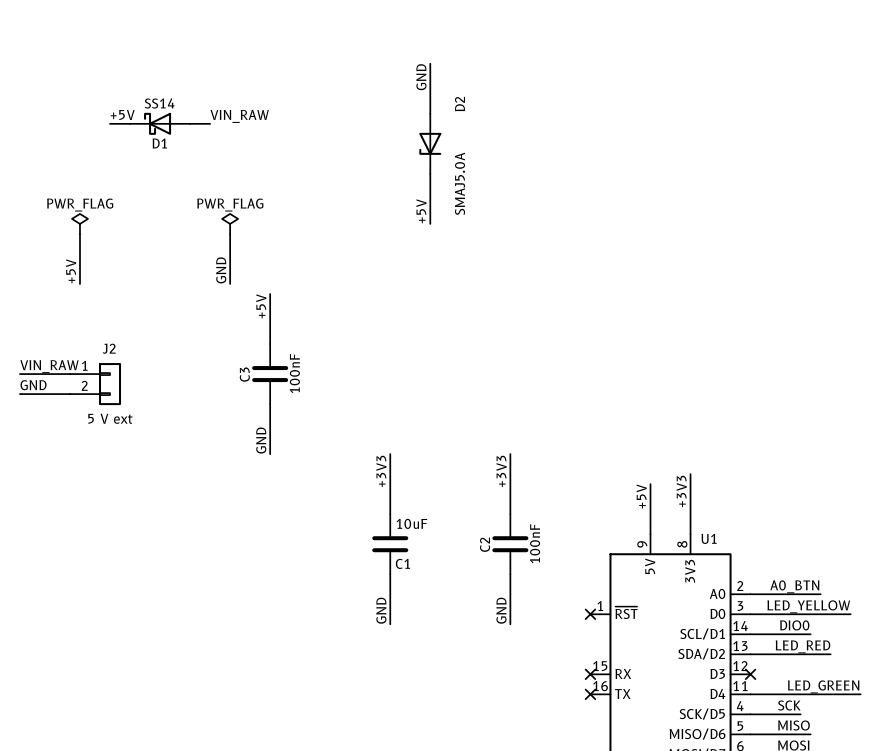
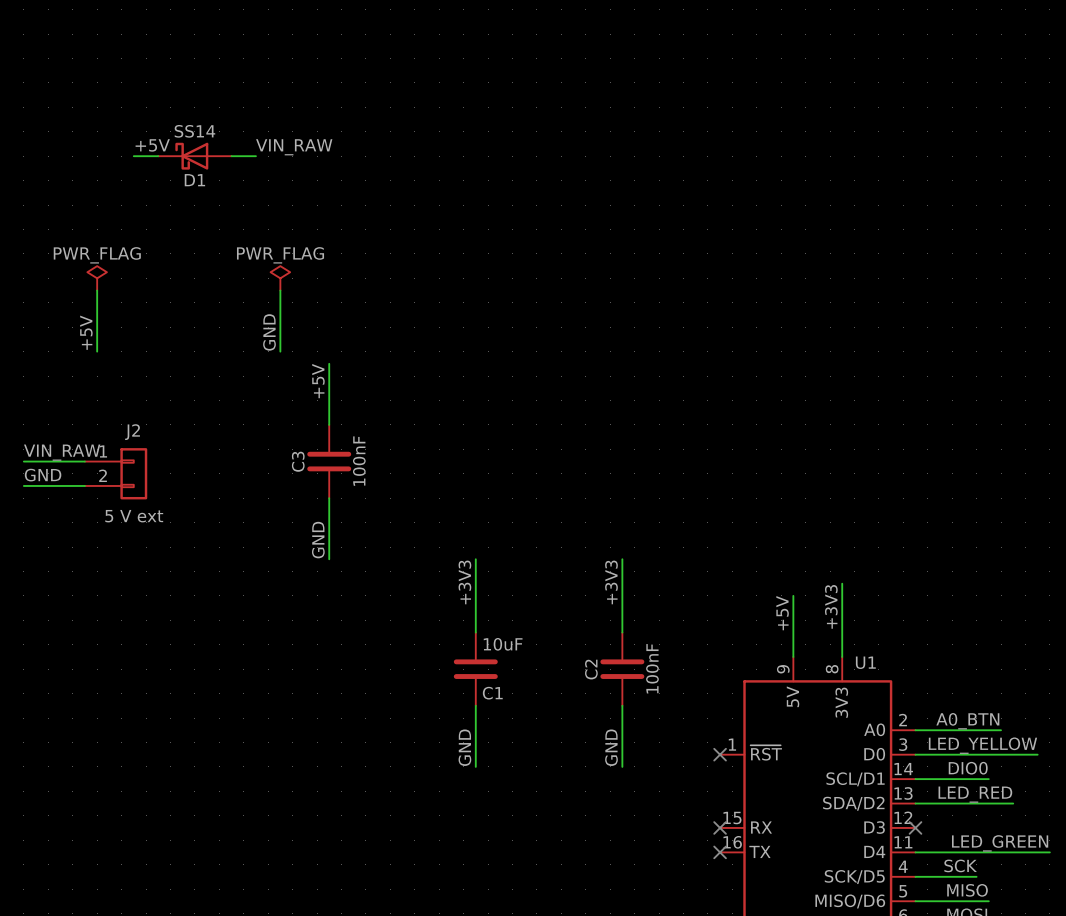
wire: (430, 63) (430, 113) -> none
label: GND (421, 77) -> none
D2: SMAJ5.0A (430, 143) -> none
wire: (430, 173) (430, 223) -> none
label: +5V (421, 211) -> none

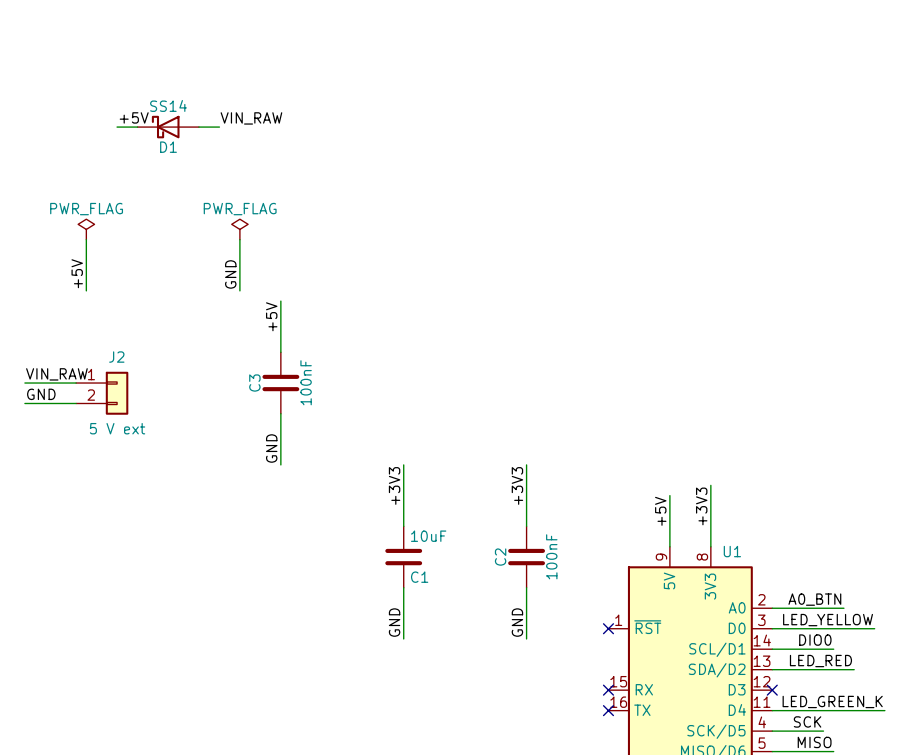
label: LED_GREEN (1000, 843) -> LED_GREEN_K (832, 701)

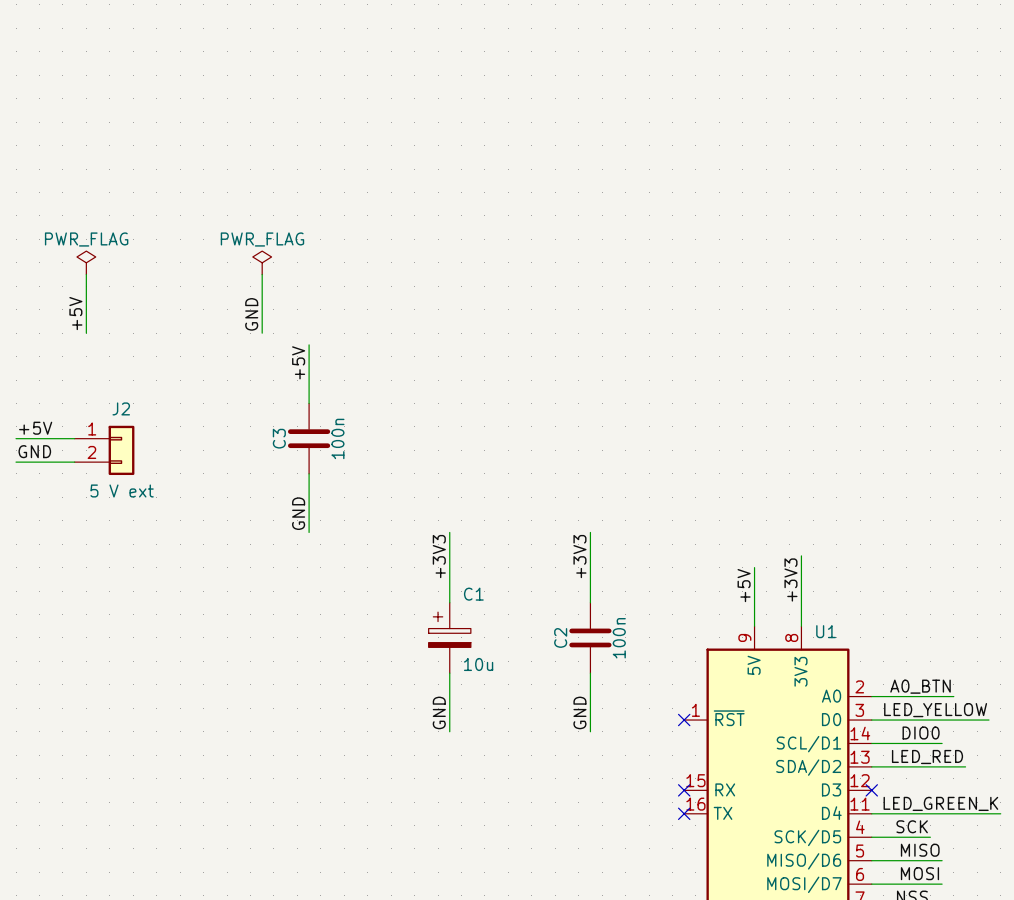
label: +5V (134, 117) -> none
label: VIN_RAW (251, 118) -> none
wire: (117, 127) (137, 127) -> none
D1: SS14 (168, 127) -> none
wire: (198, 127) (219, 127) -> none
label: VIN_RAW (56, 374) -> +5V (35, 428)
C3 value: 100nF (306, 382) -> 100n (337, 438)
C1 symbol: [385, 526, 423, 588] -> [428, 602, 471, 674]
C1 value: 10uF (428, 536) -> 10u (478, 664)
C2 value: 100nF (551, 556) -> 100n (619, 638)
C1 name position: C1 (419, 577) -> C1 (473, 594)

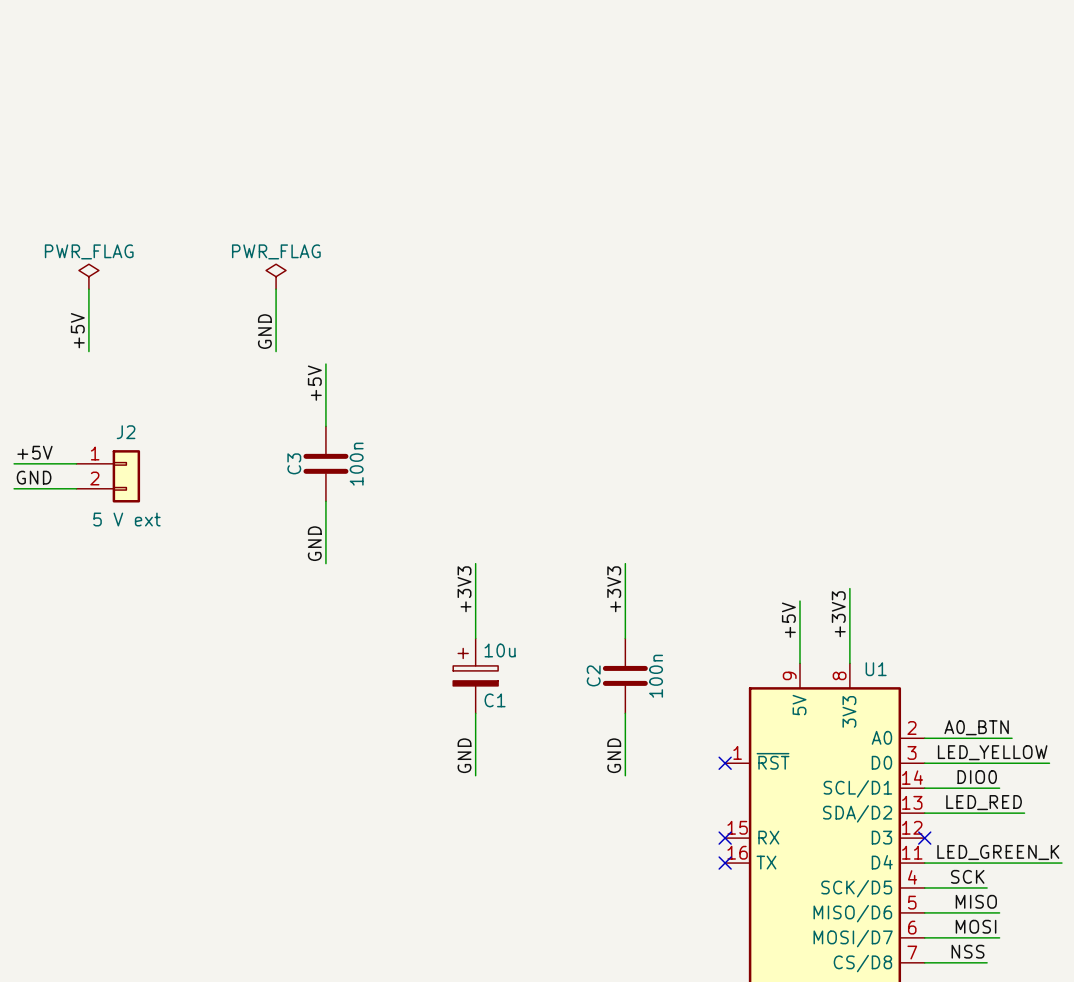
C1 name position: C1 (473, 594) -> C1 (495, 700)
C1 value position: 10u (478, 664) -> 10u (500, 650)

